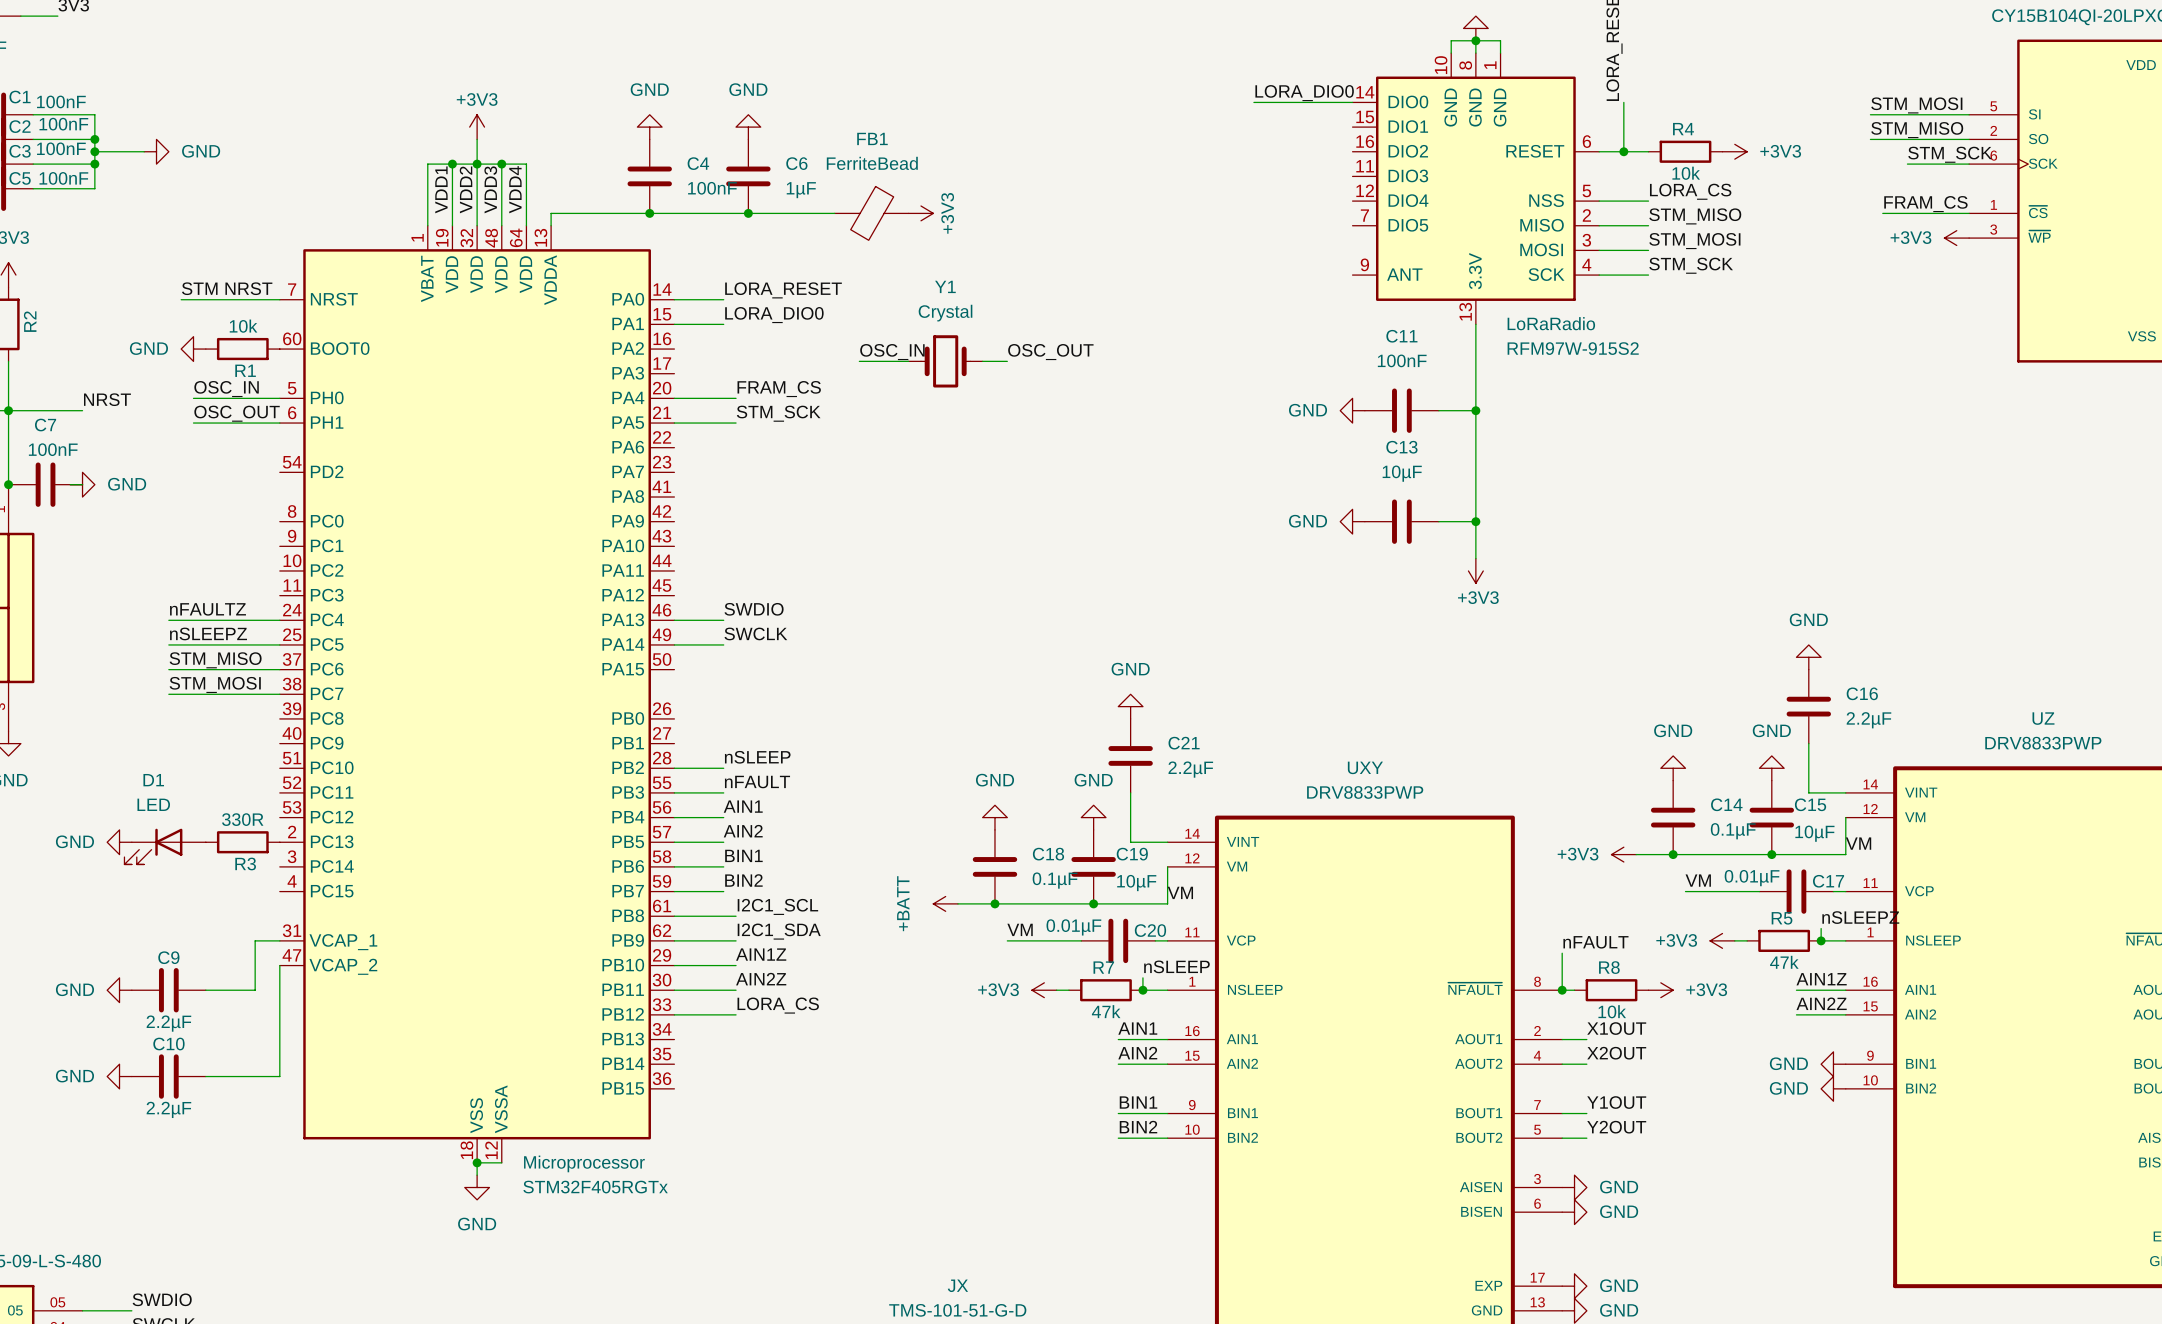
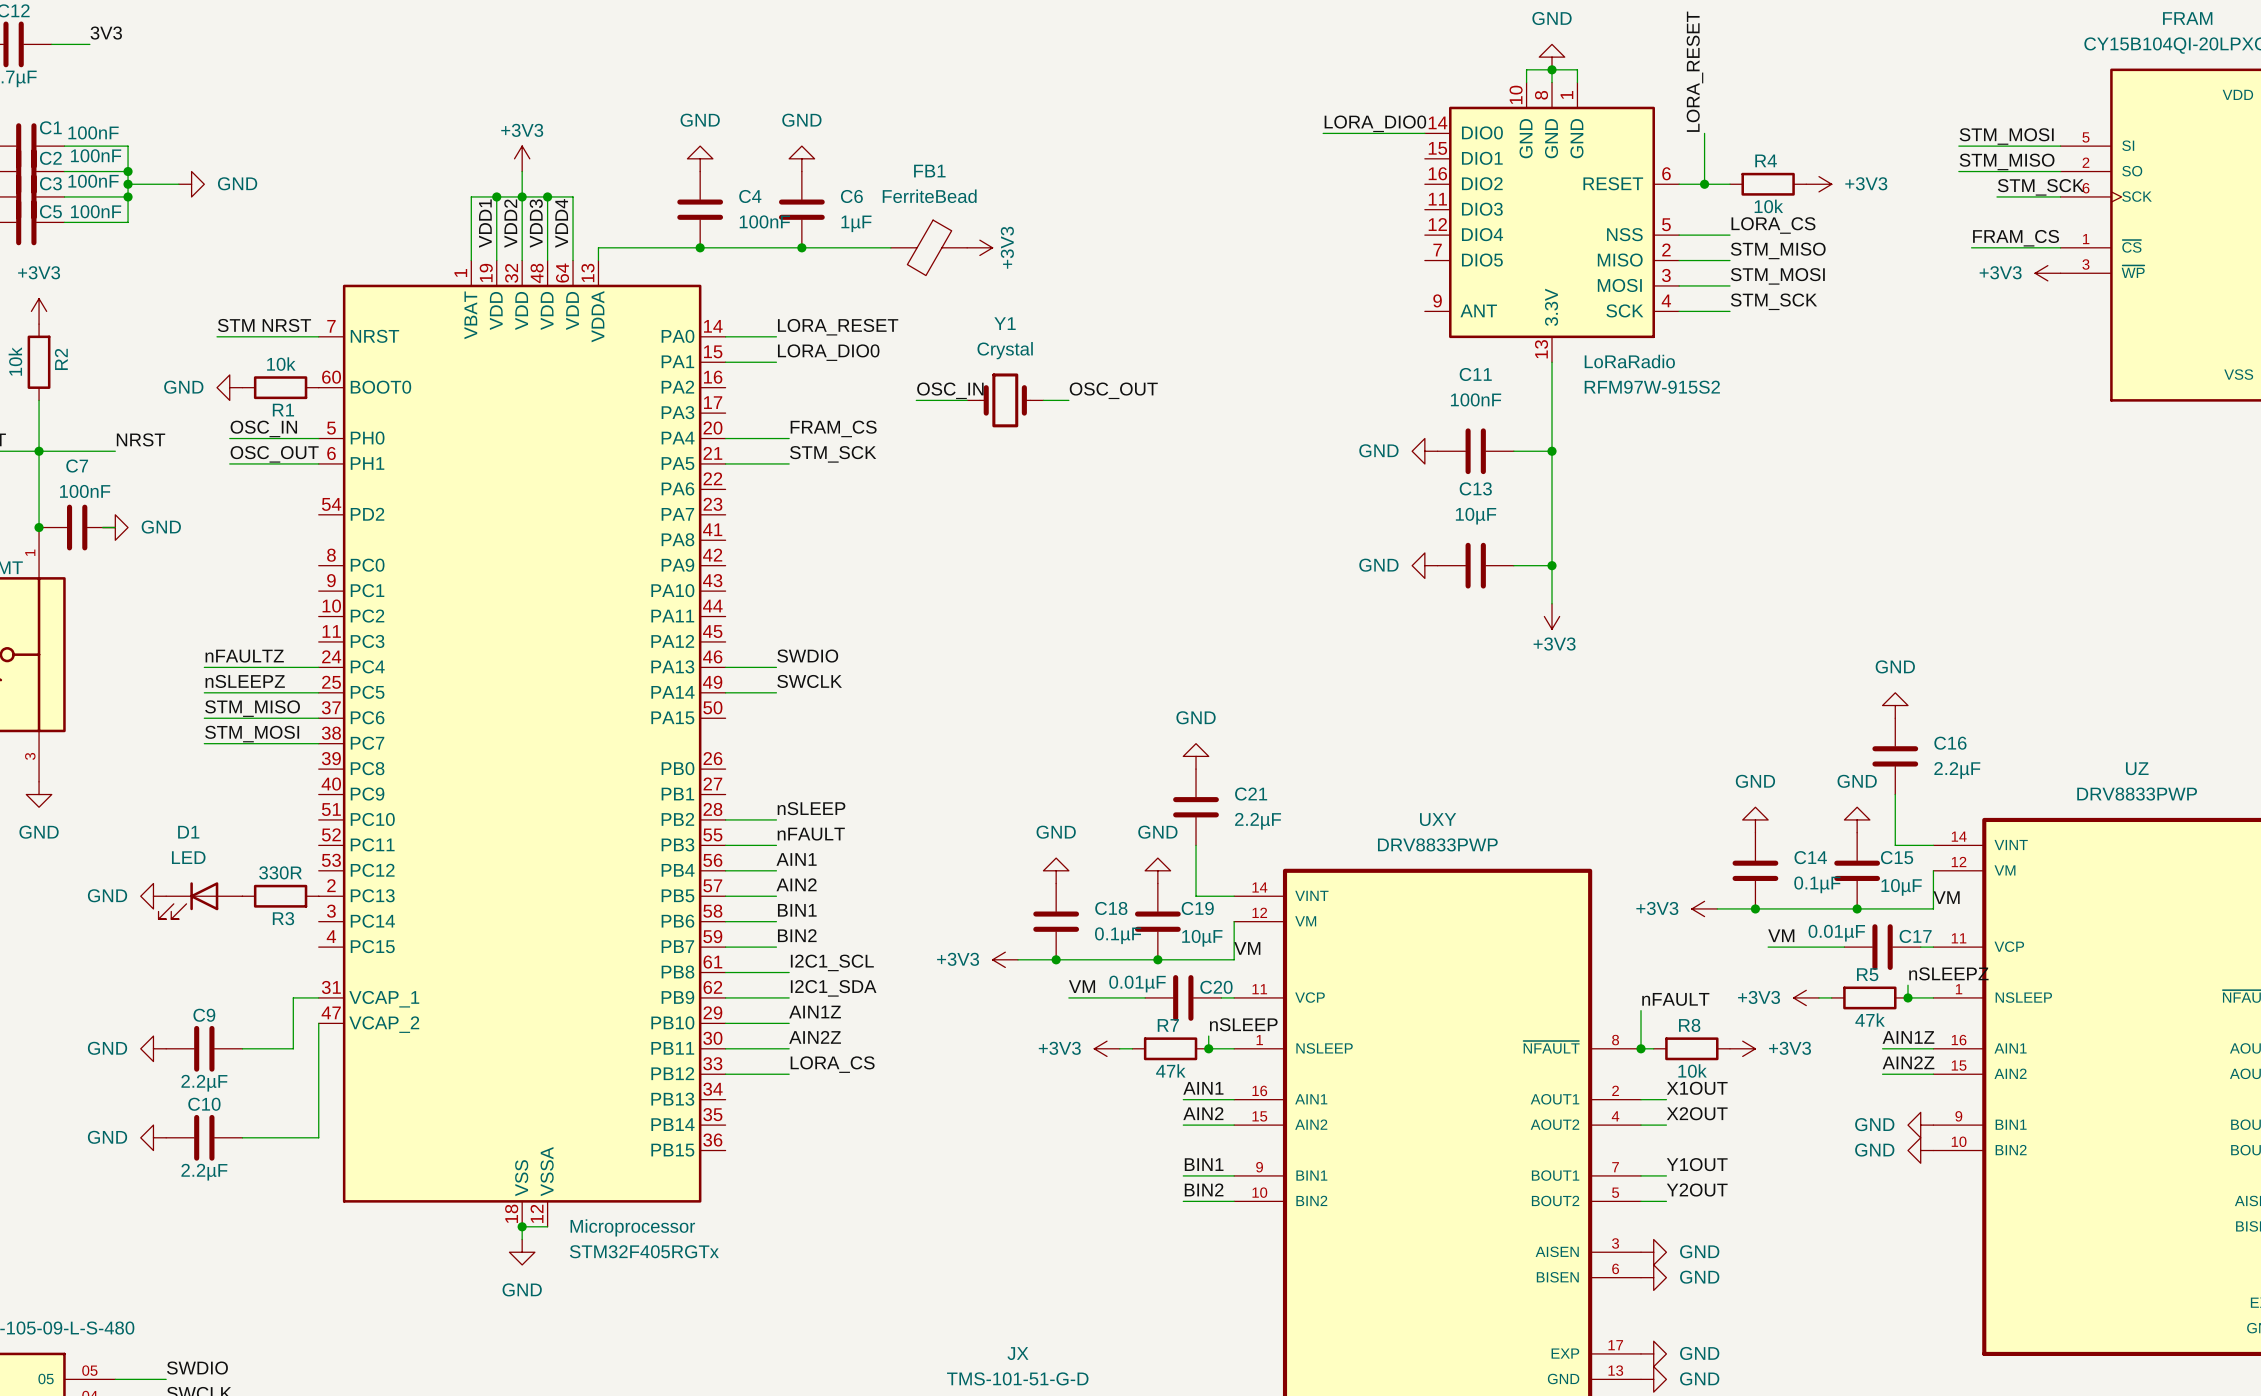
power symbol: +BATT (945, 903) -> +3V3 (1005, 959)

